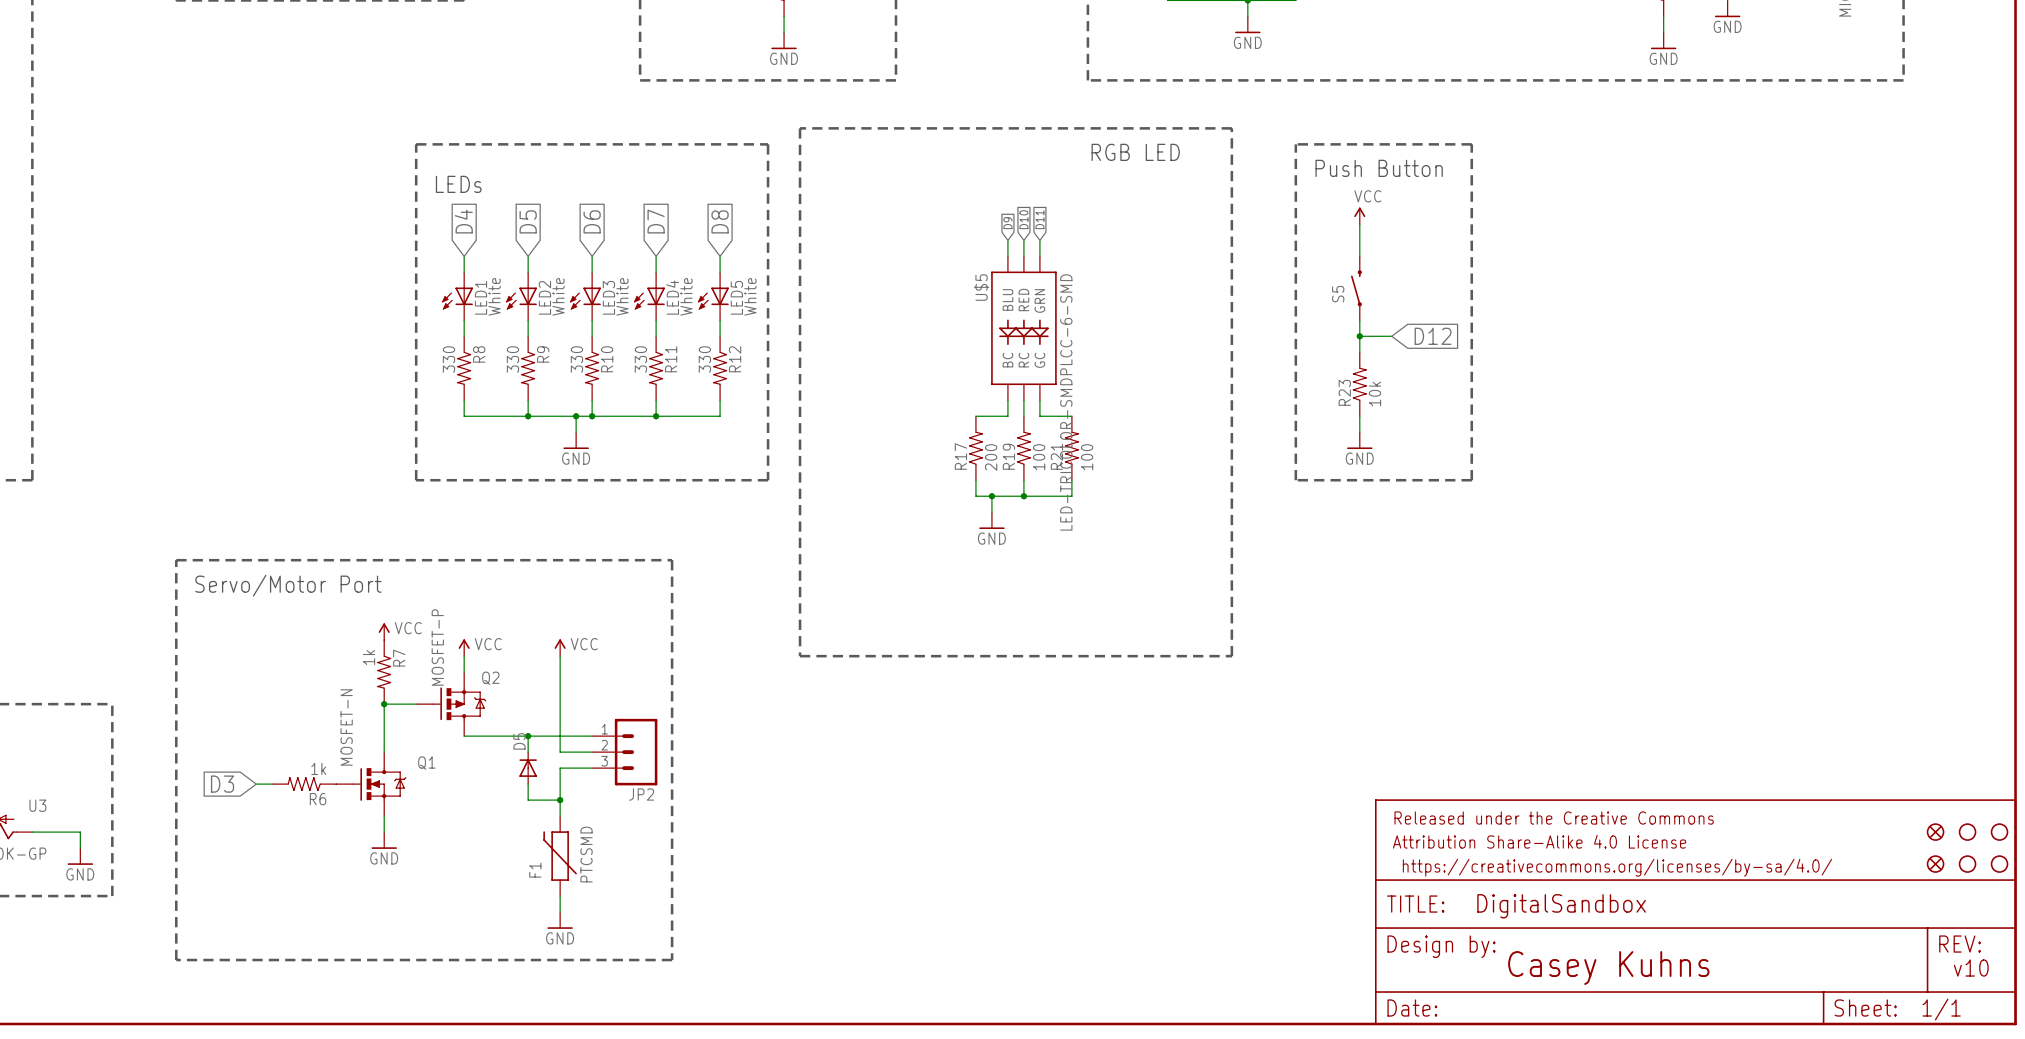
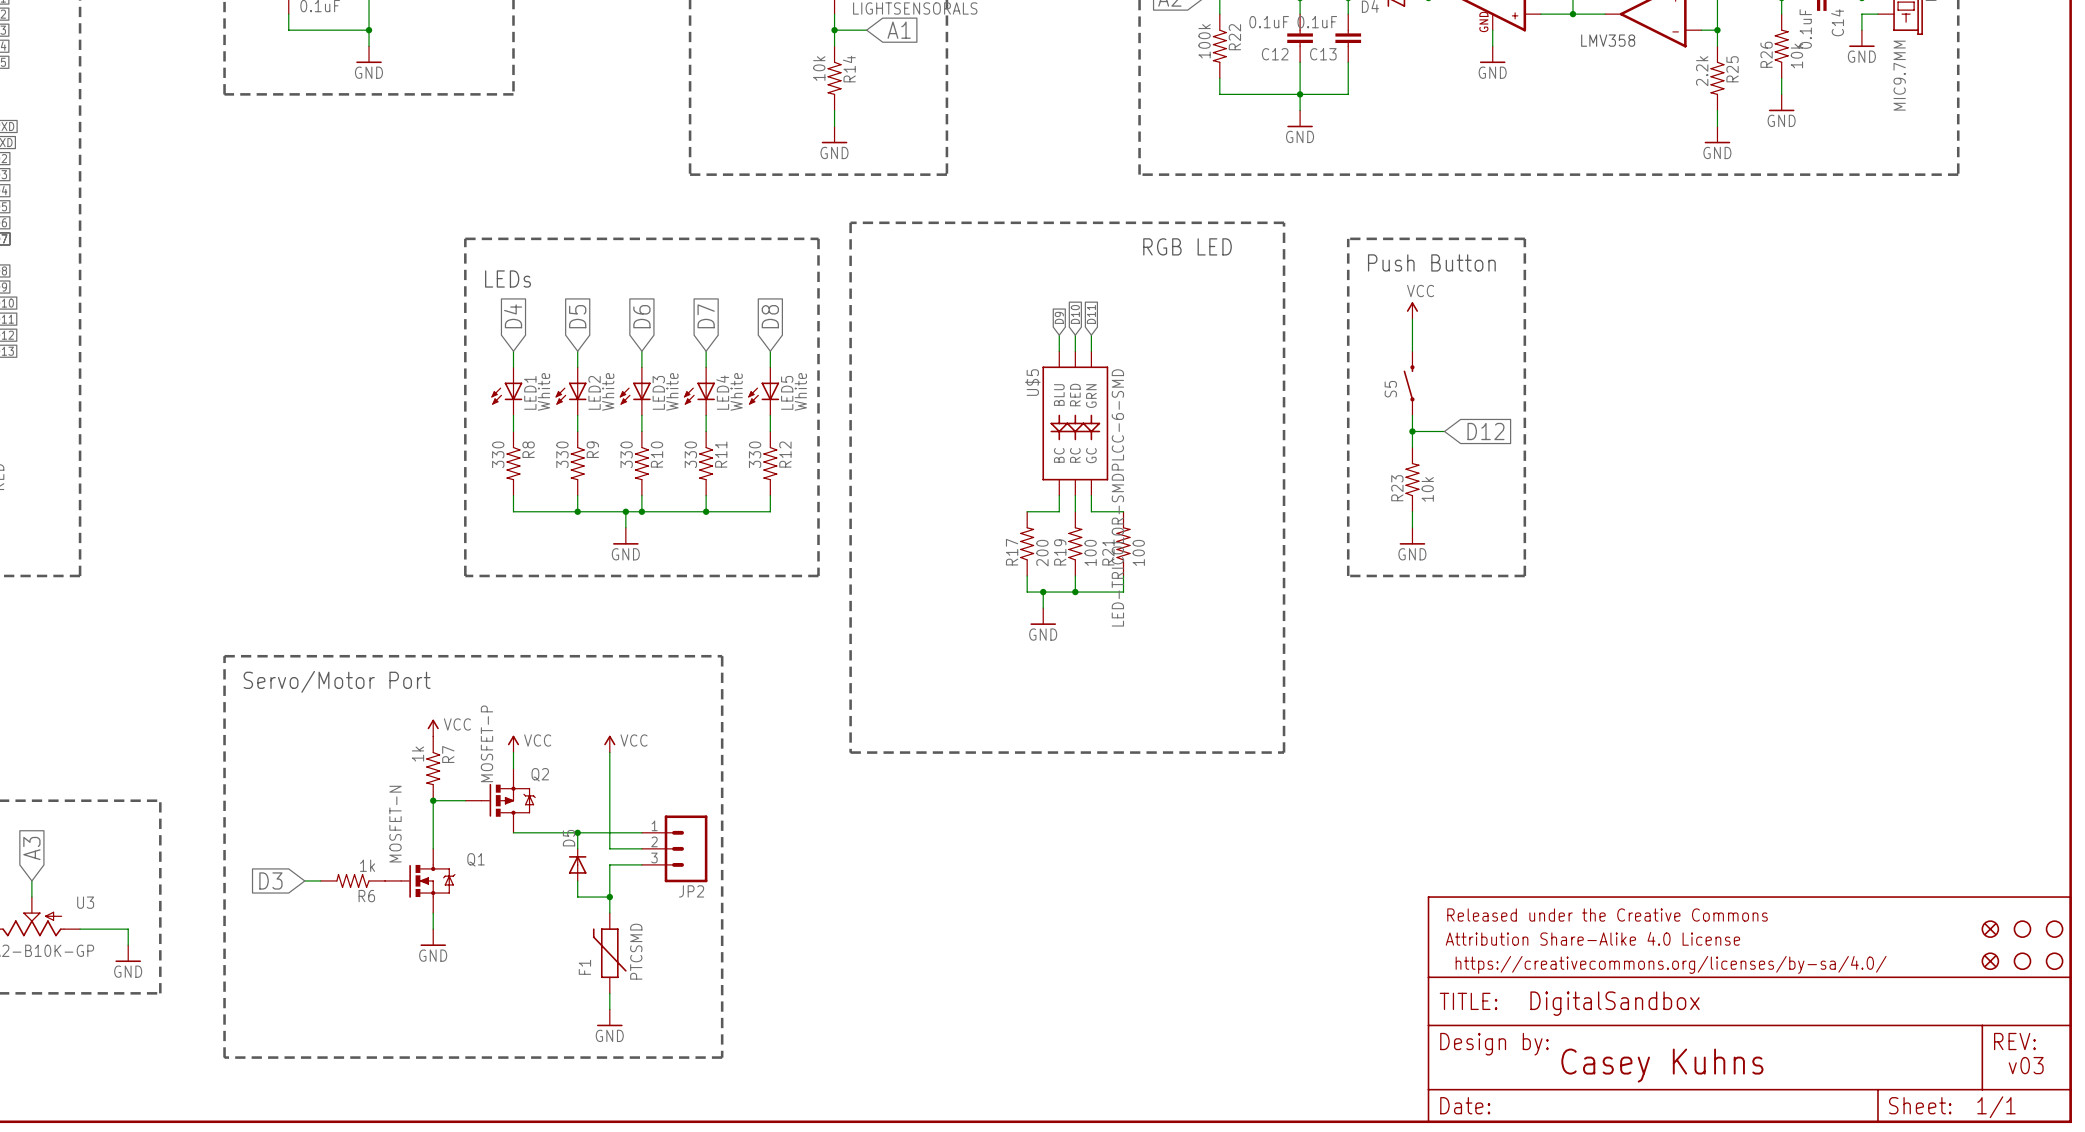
text: v10 (1971, 968) -> v03 (2026, 1065)

